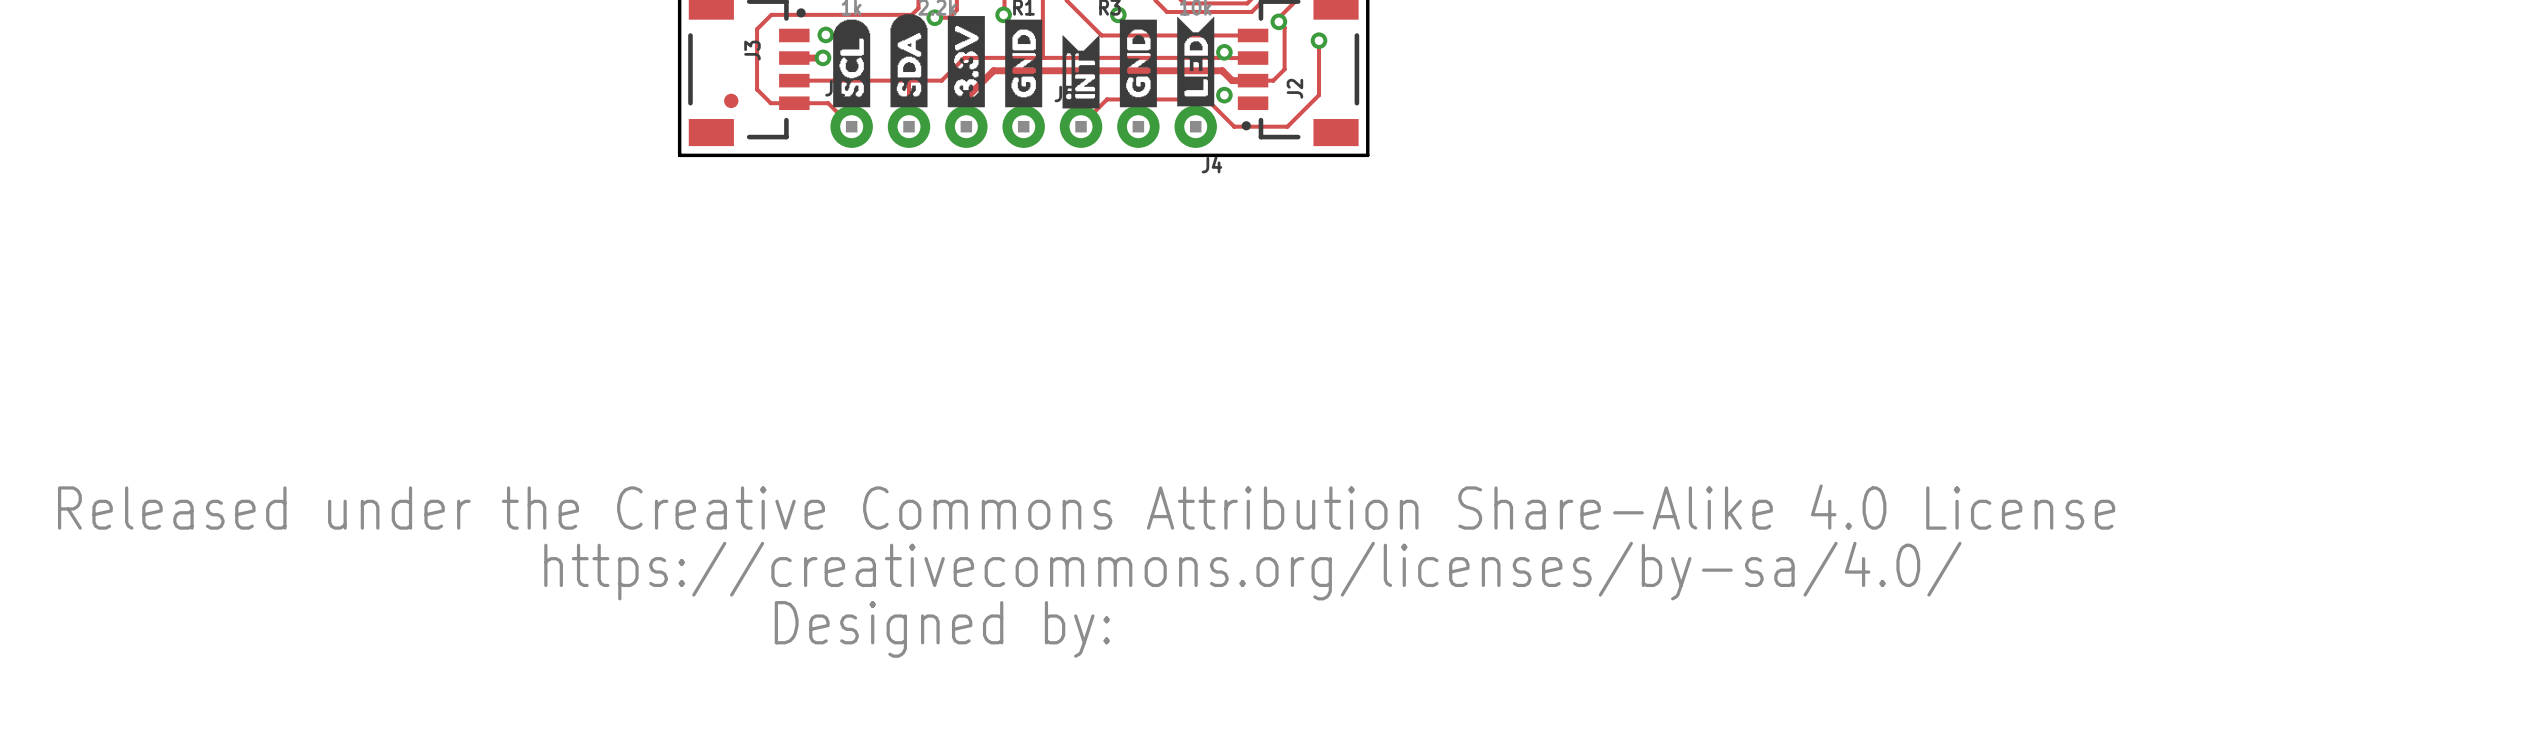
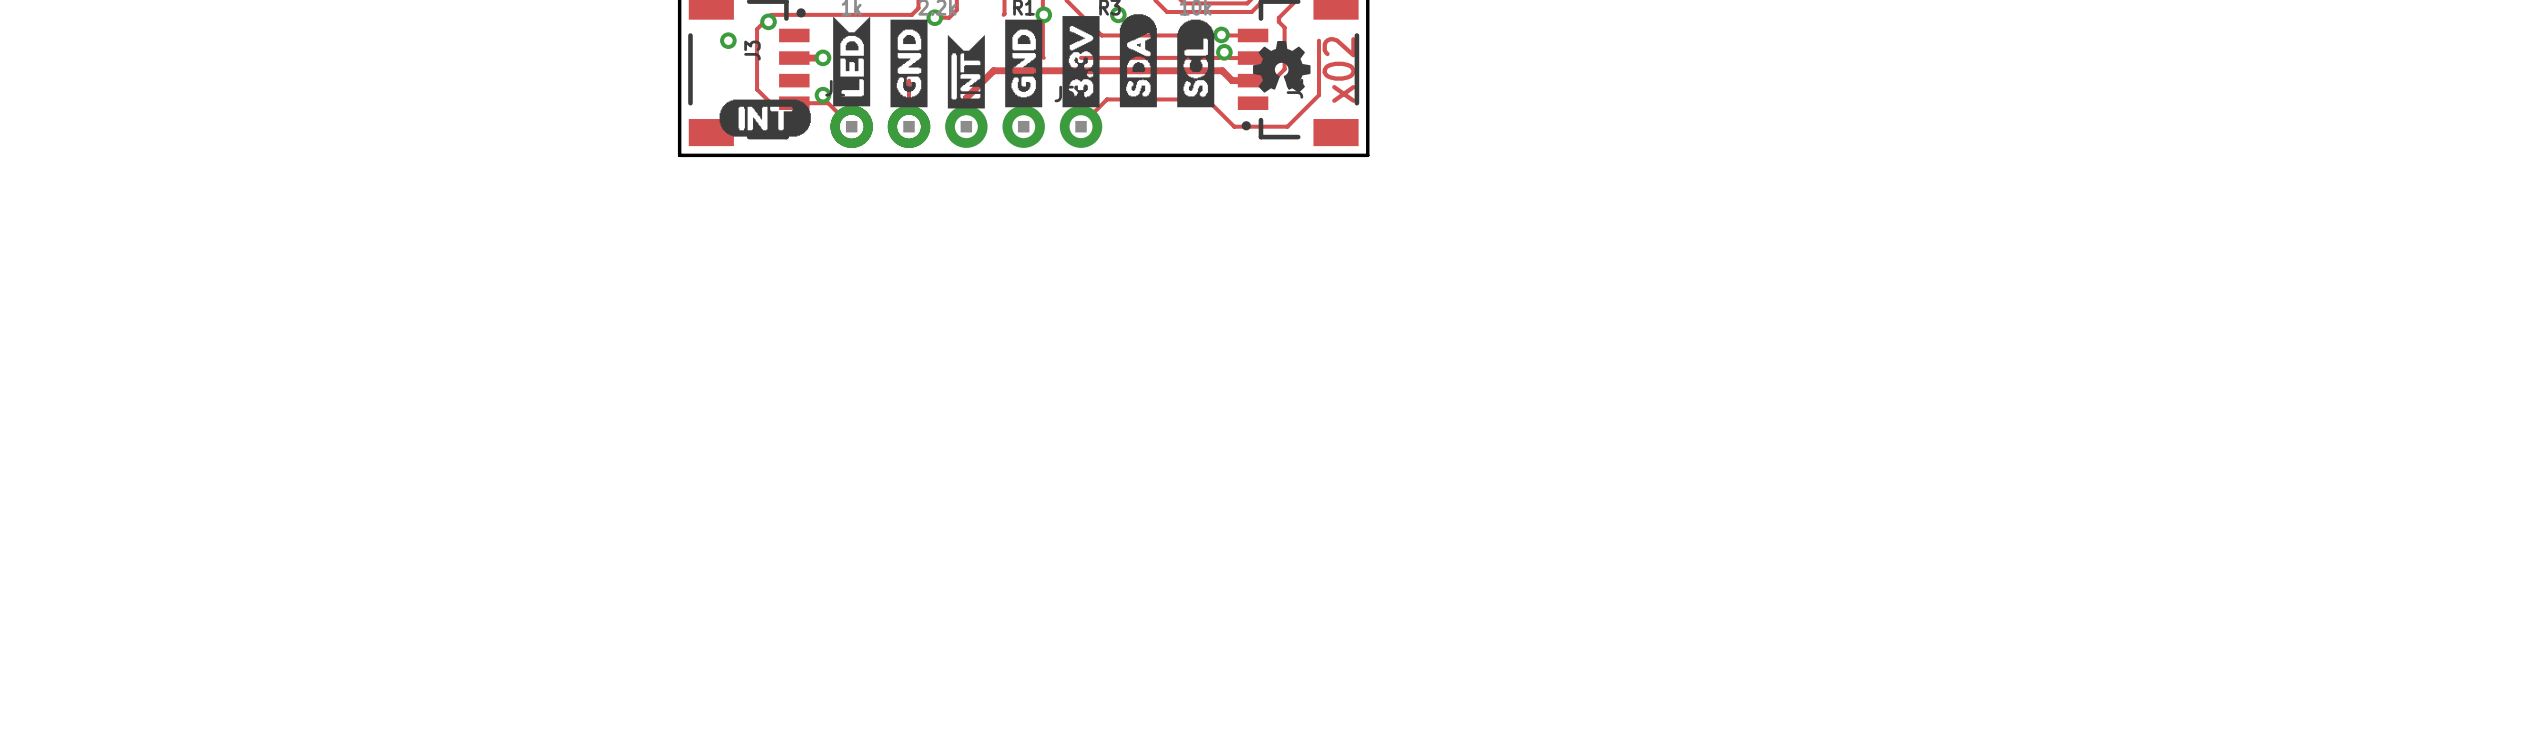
via: (1003, 14) -> none
via: none -> (1043, 14)
via: none -> (768, 21)
via: (1278, 21) -> none
via: (825, 34) -> none
via: none -> (1221, 34)
via: none -> (728, 40)
via: (1319, 40) -> none
drawing: none -> [1253, 41, 1311, 93]
track: (1081, 57) (964, 57) (941, 80) (794, 80) -> none
drawing position: (909, 60) -> (1138, 60)
drawing position: (966, 61) -> (1081, 61)
drawing position: (1195, 61) -> (851, 61)
drawing position: (851, 63) -> (1195, 63)
drawing position: (1138, 63) -> (909, 63)
text: none -> x02 (1339, 69)
drawing position: (1081, 71) -> (966, 71)
via: none -> (822, 95)
via: (1224, 95) -> none
drawing: none -> [719, 99, 811, 137]
part: (731, 100) -> none
J4 side: top (1167, 126) -> bottom (880, 126)
drawing: [57, 484, 2116, 658] -> none

